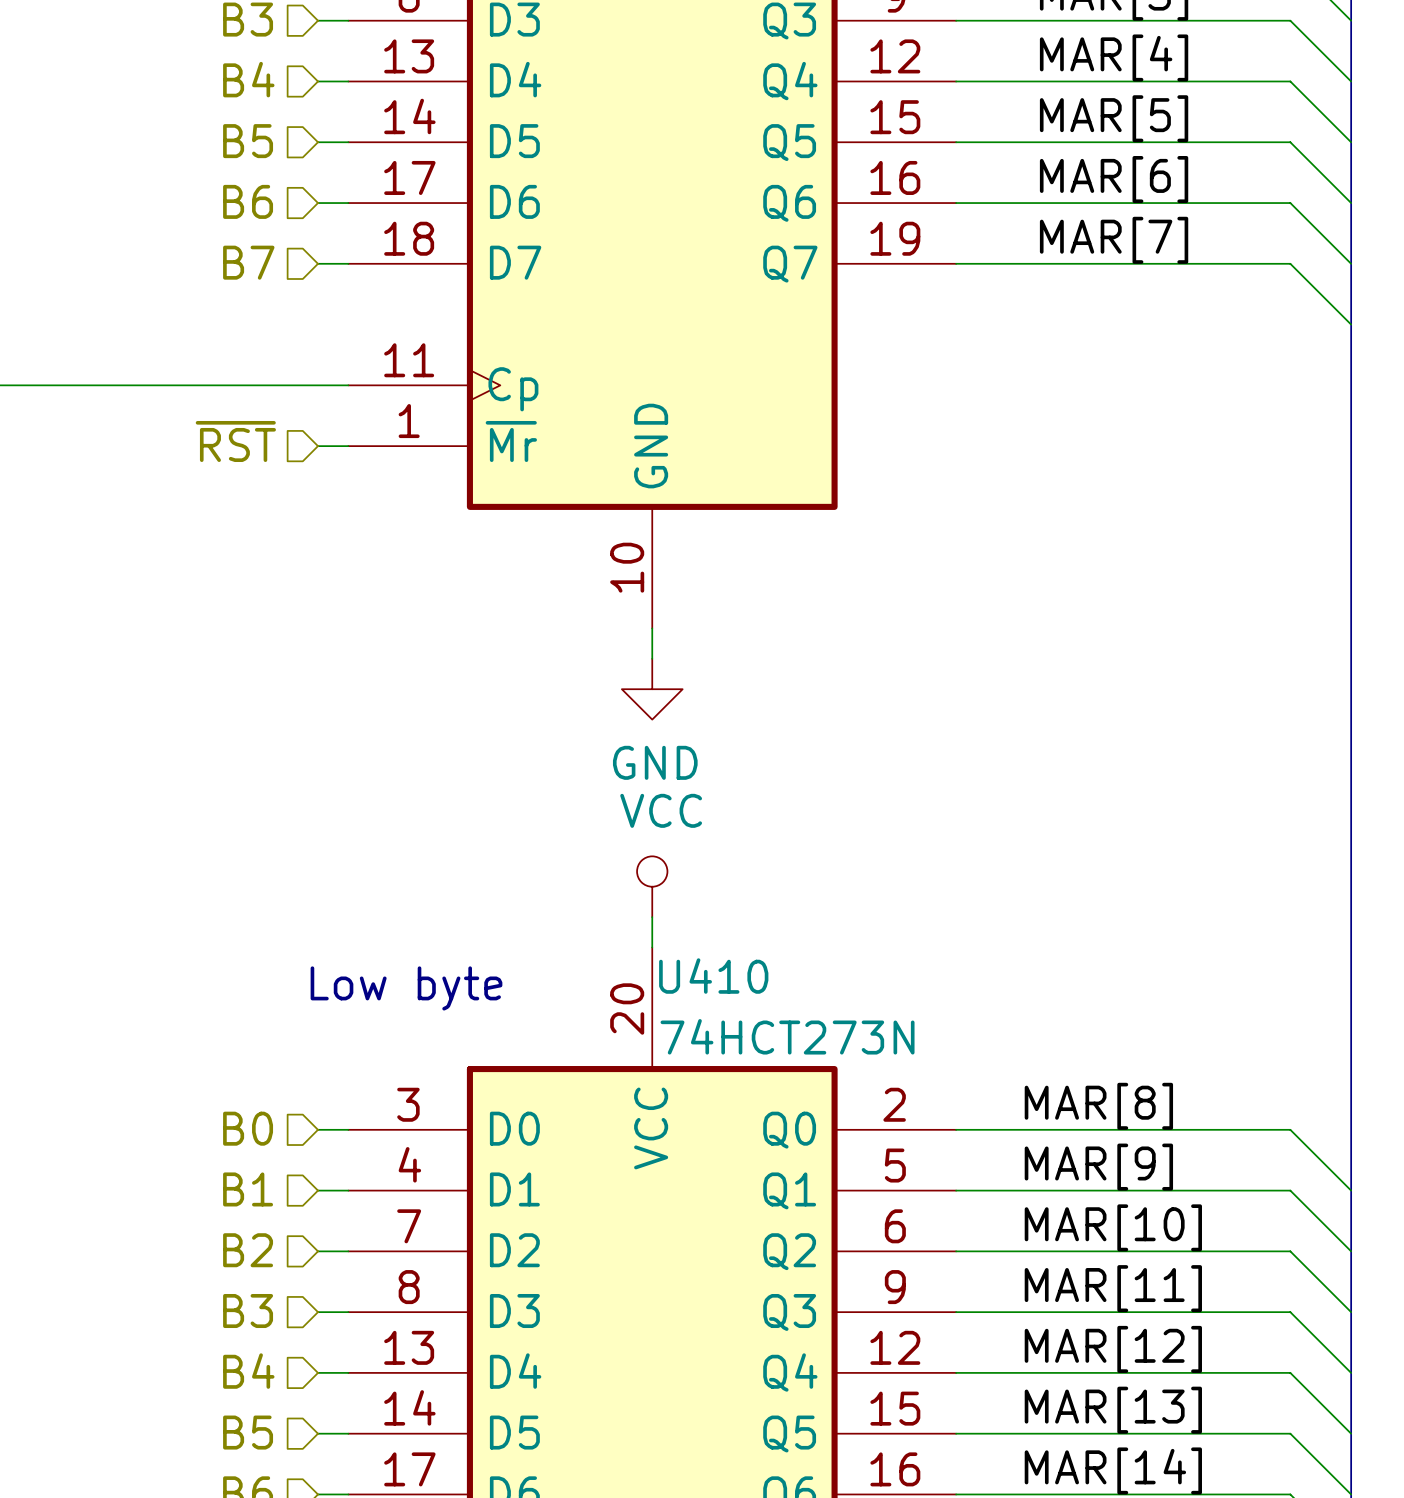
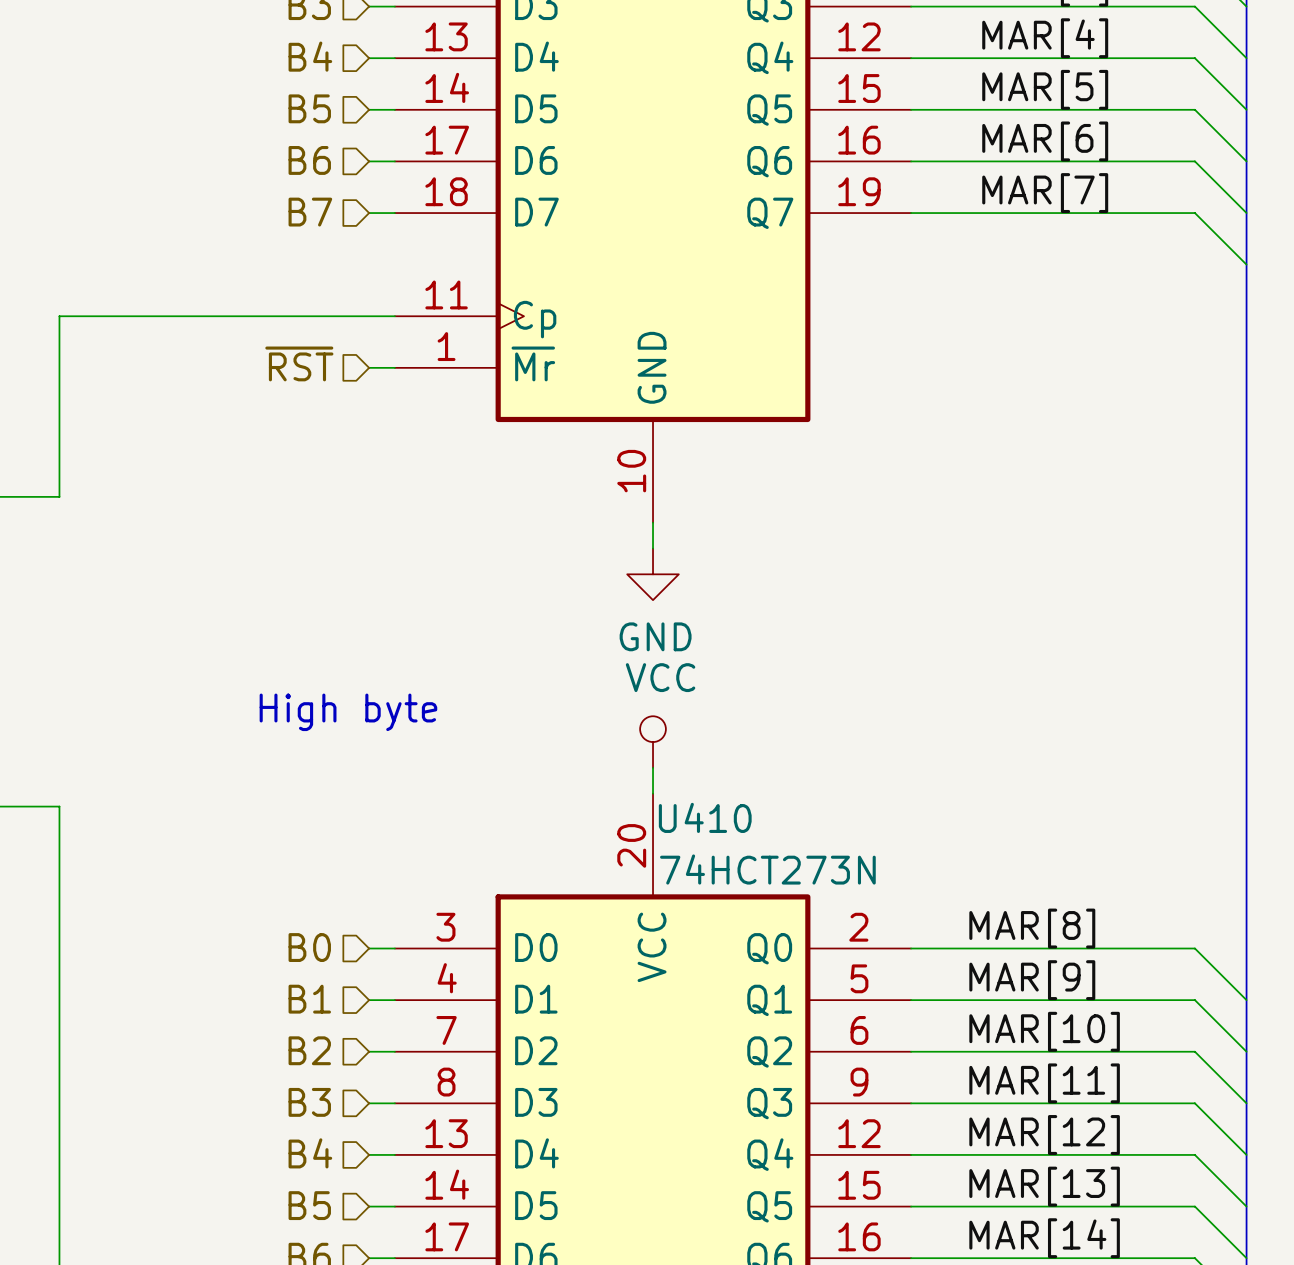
text: none -> High byte (348, 712)
text: Low byte (406, 988) -> none

